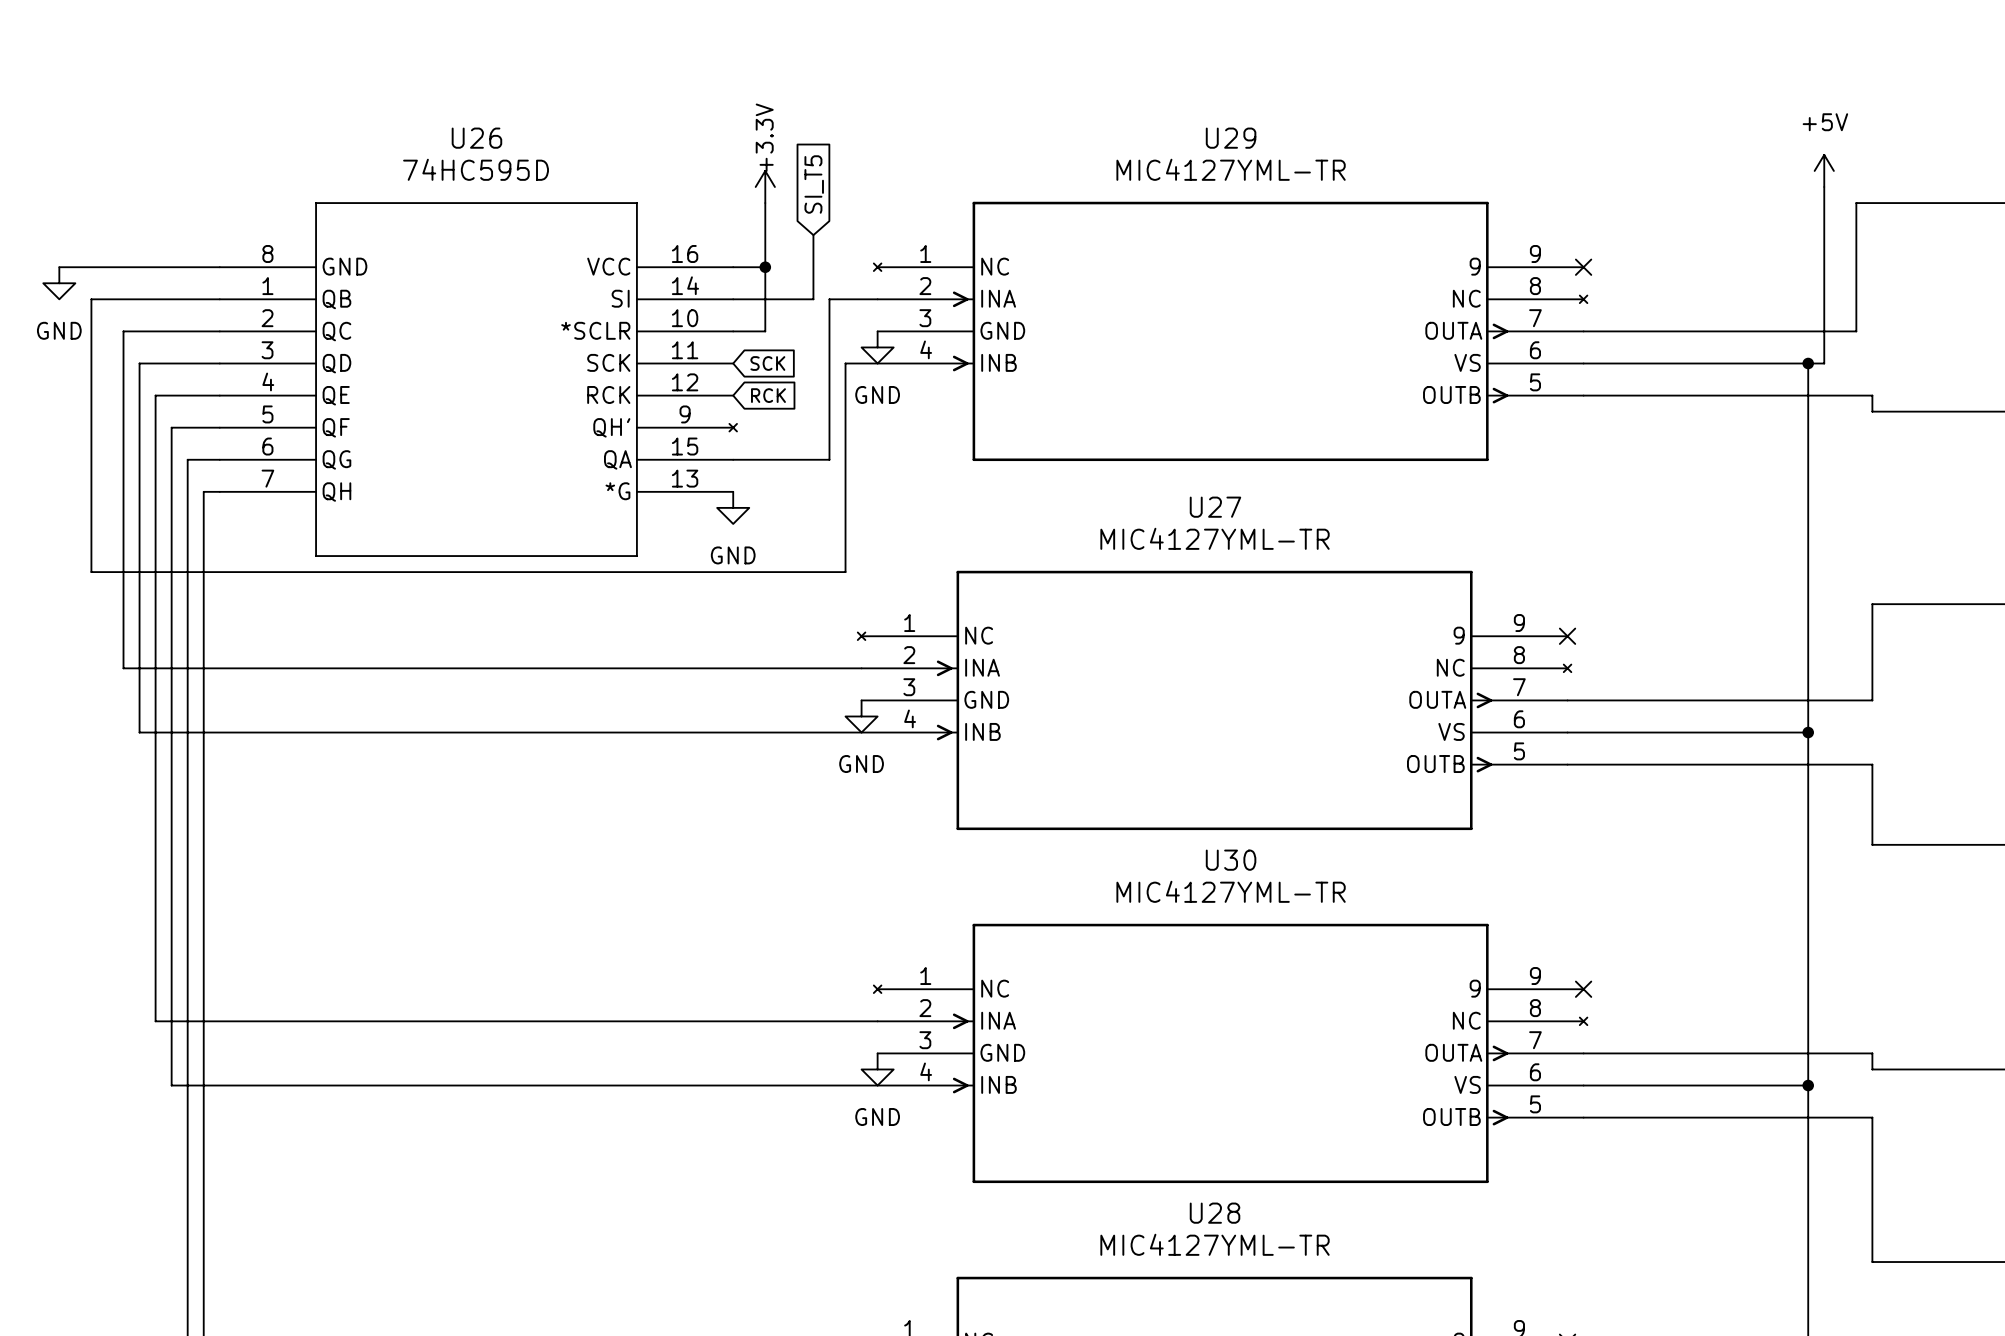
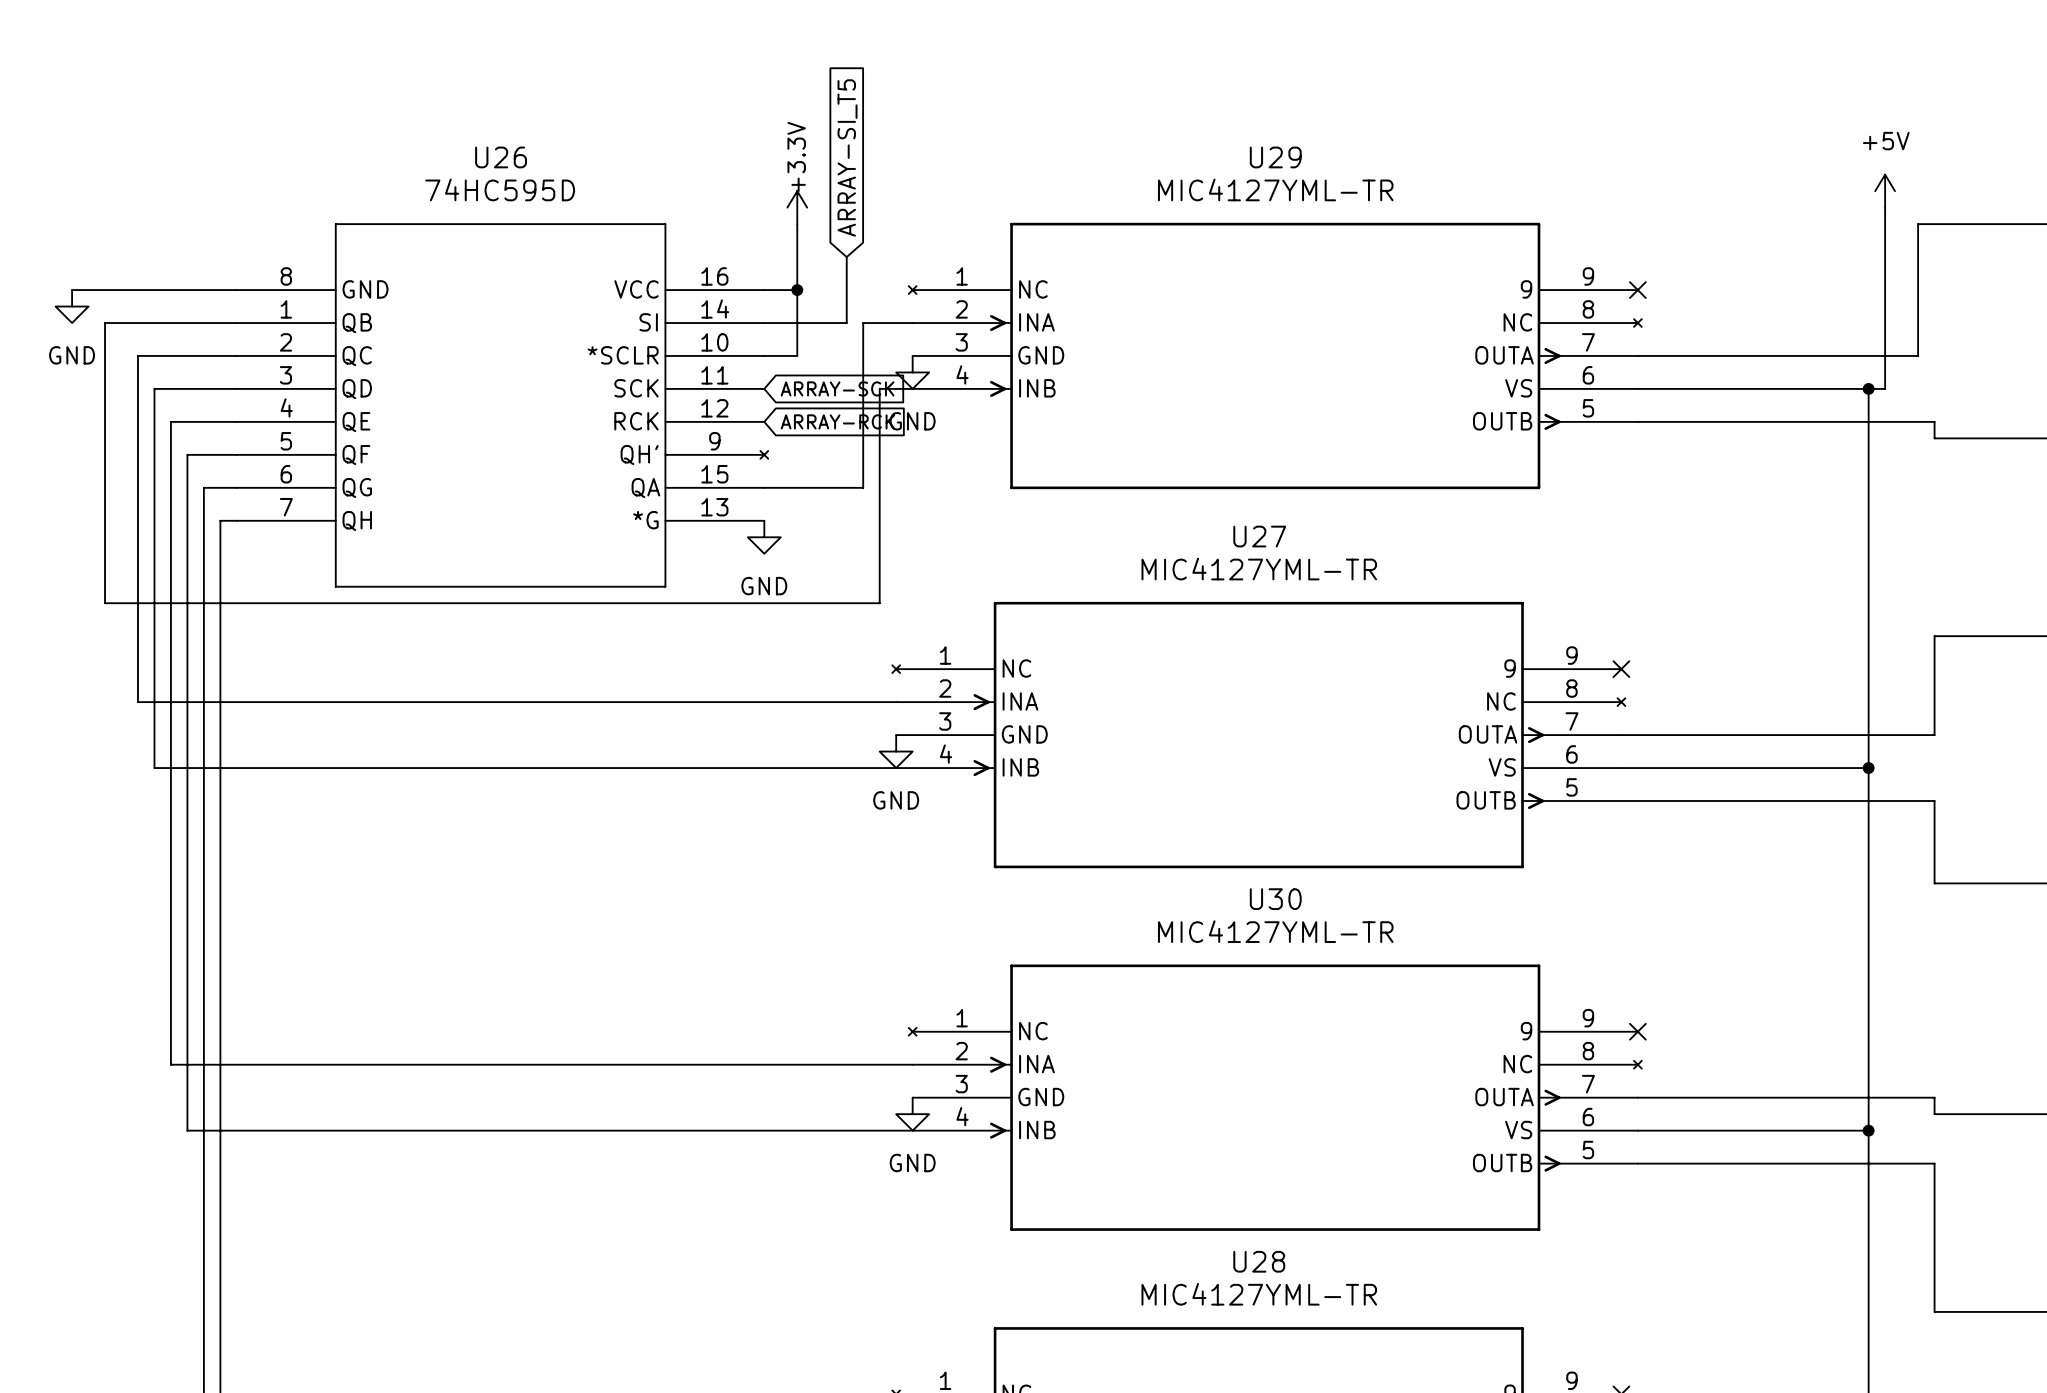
global label: SI_T5 (814, 184) -> ARRAY-SI_T5 (847, 157)
global label: SCK (767, 363) -> ARRAY-SCK (837, 388)
global label: RCK (768, 395) -> ARRAY-RCK (837, 421)

